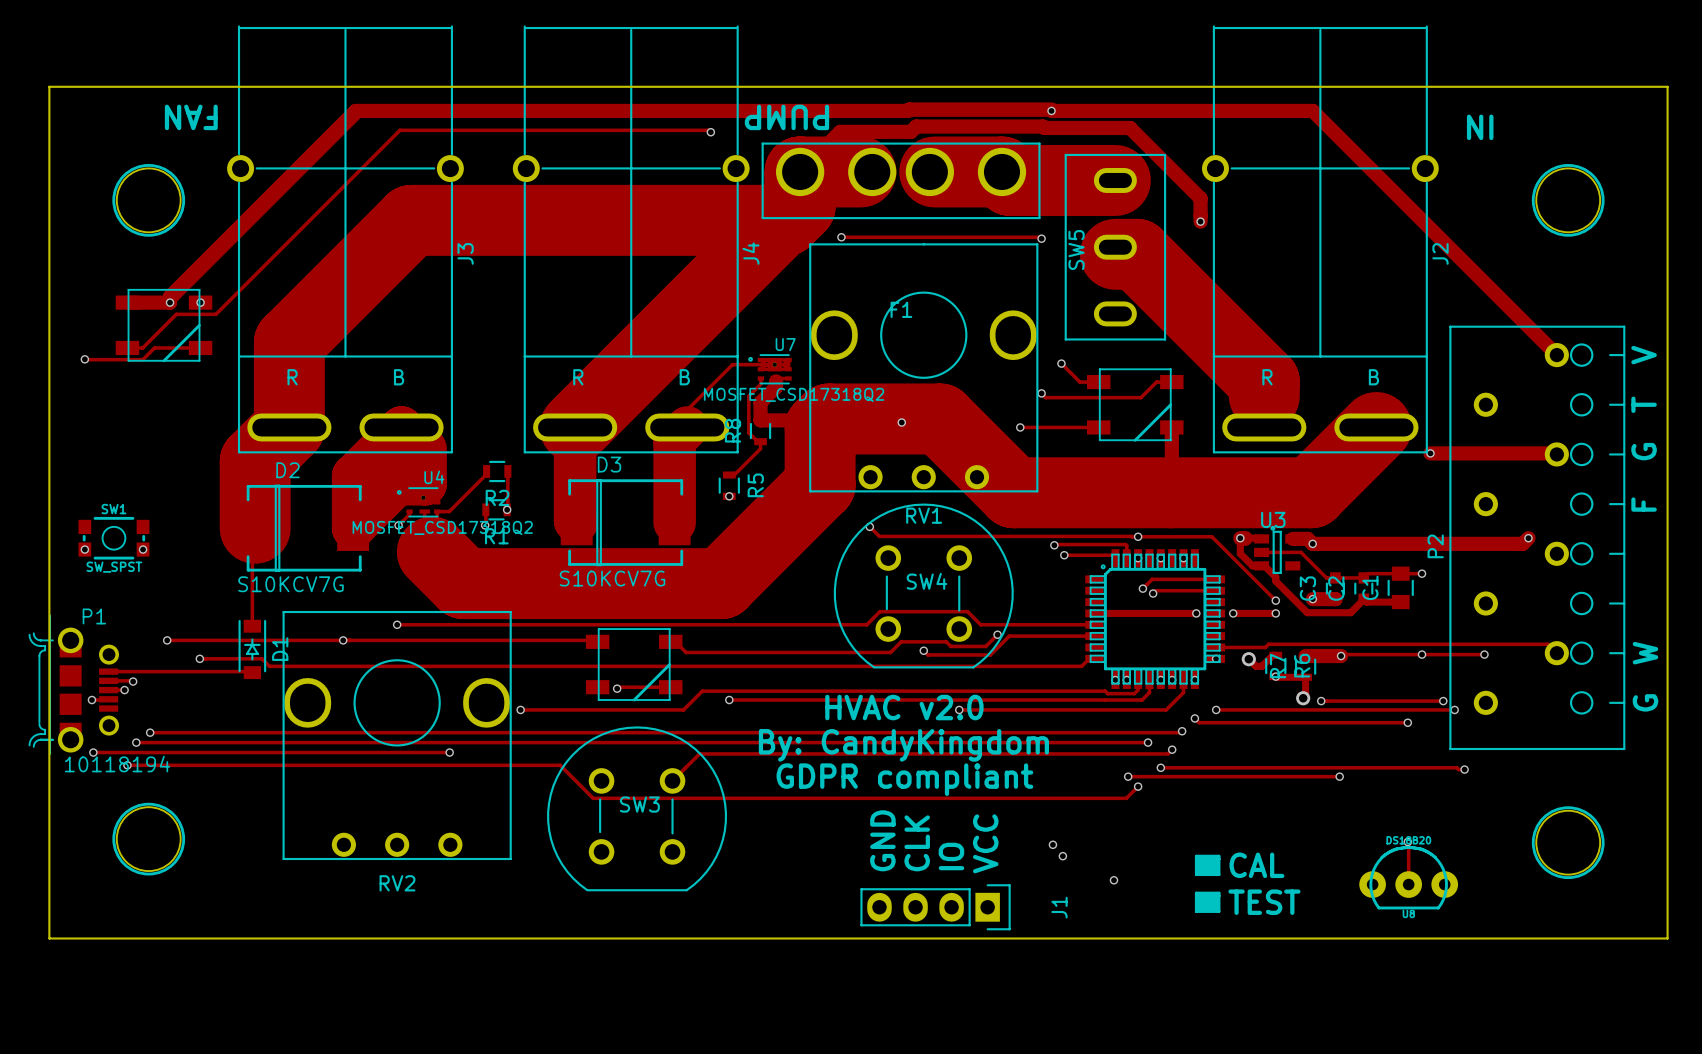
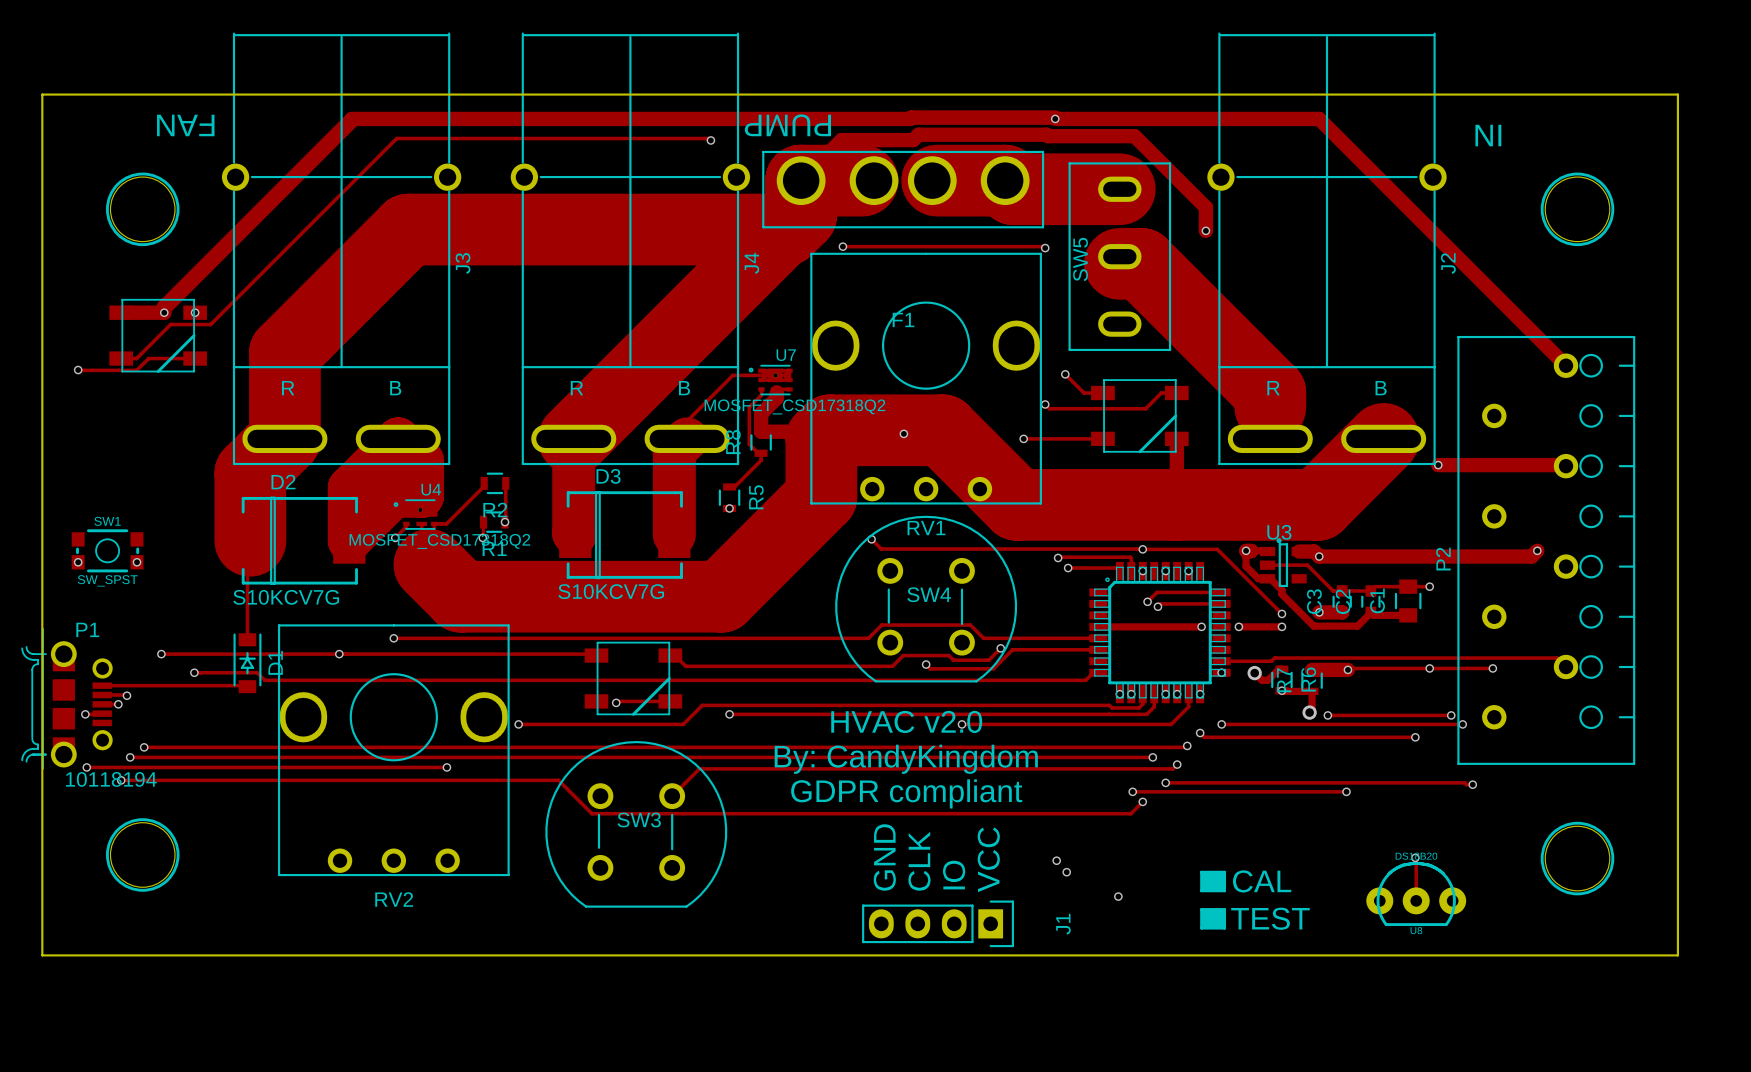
text: V (1644, 355) -> none
text: T (1644, 404) -> none
text: G (1644, 451) -> none
text: F (1644, 504) -> none
text: W (1645, 653) -> none
text: G (1645, 702) -> none

